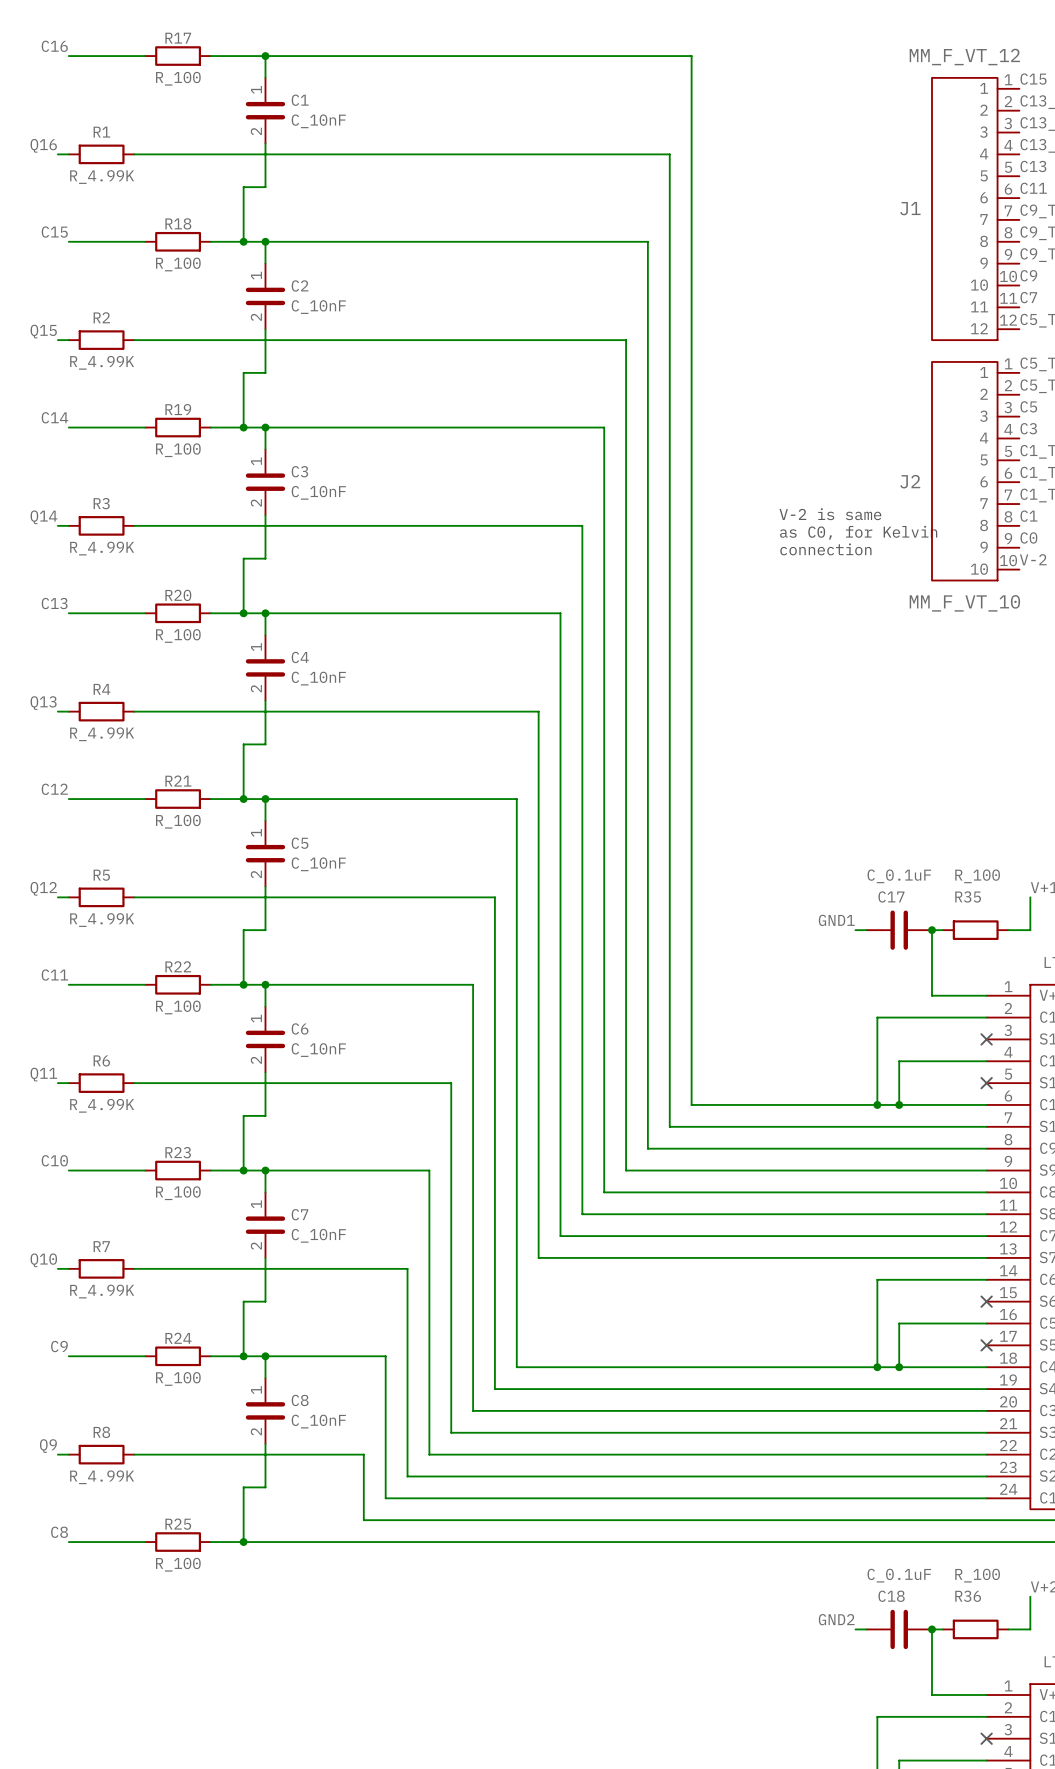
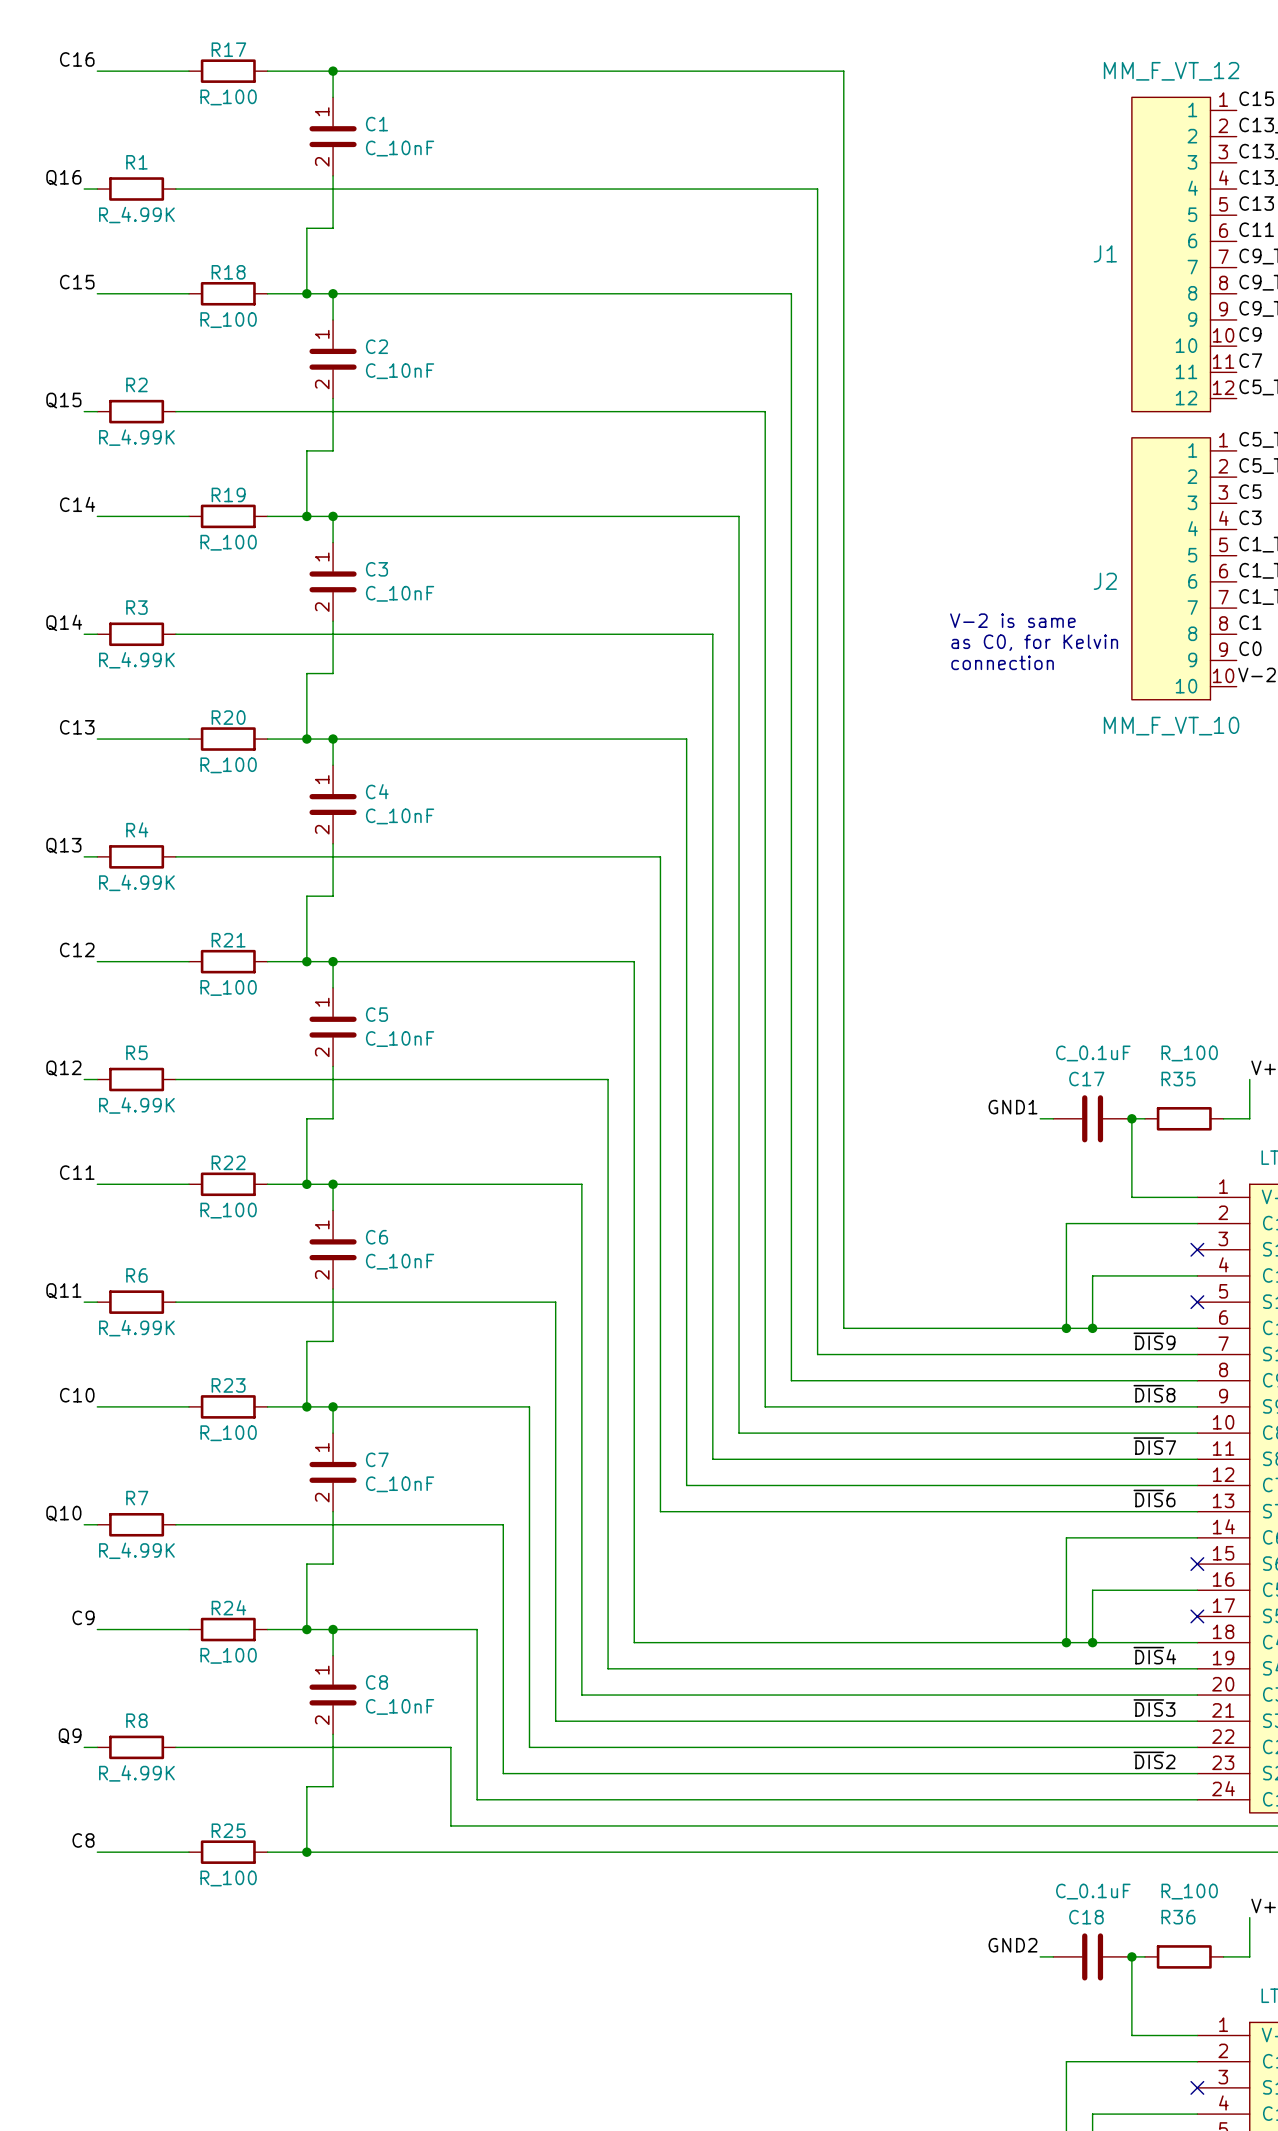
label: none -> ~{DIS}9 (1154, 1341)
label: none -> ~{DIS}8 (1154, 1393)
label: none -> ~{DIS}7 (1154, 1446)
label: none -> ~{DIS}6 (1154, 1498)
label: none -> ~{DIS}4 (1154, 1655)
label: none -> ~{DIS}3 (1154, 1708)
label: none -> ~{DIS}2 (1154, 1760)

